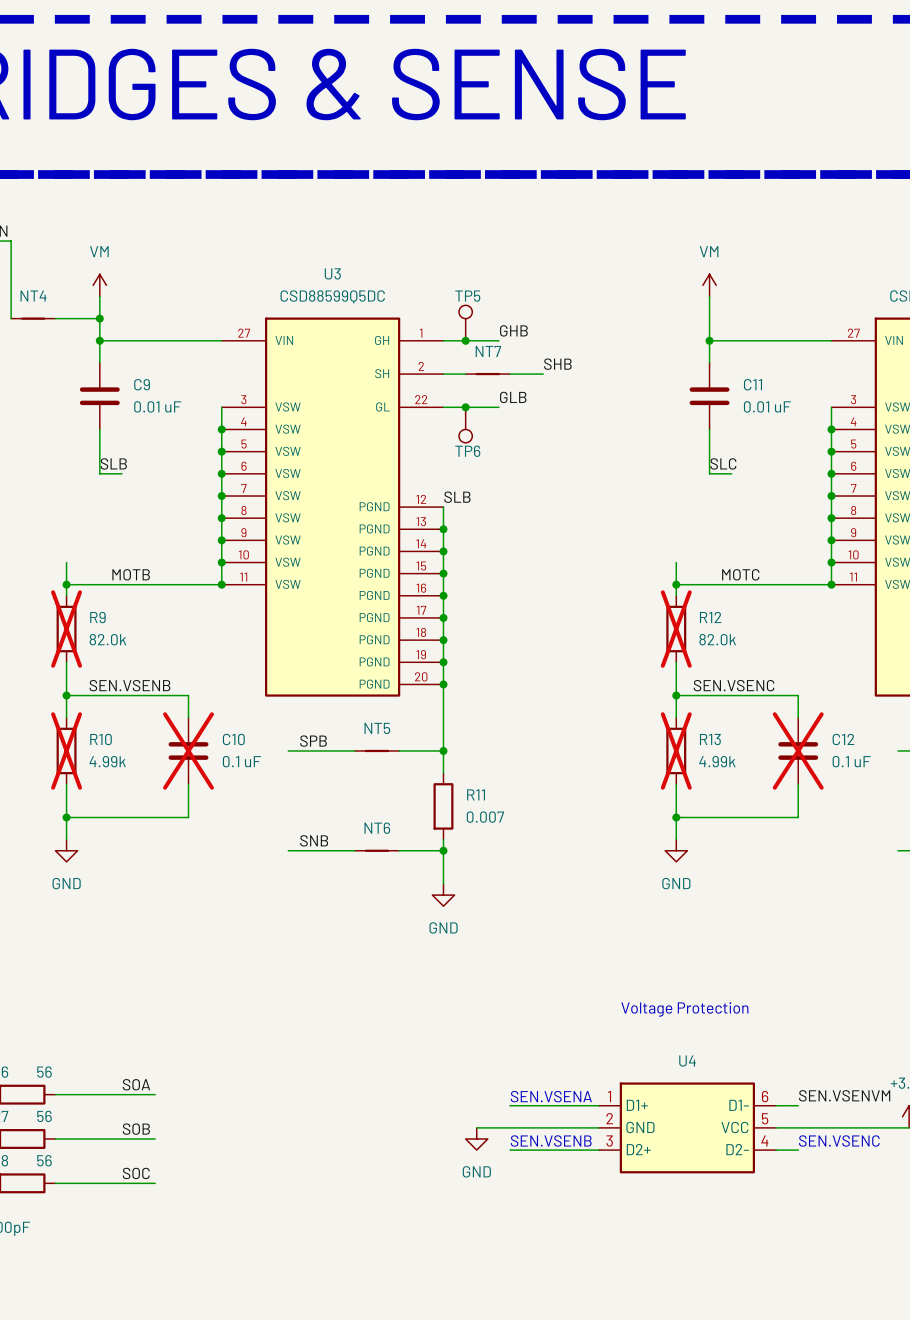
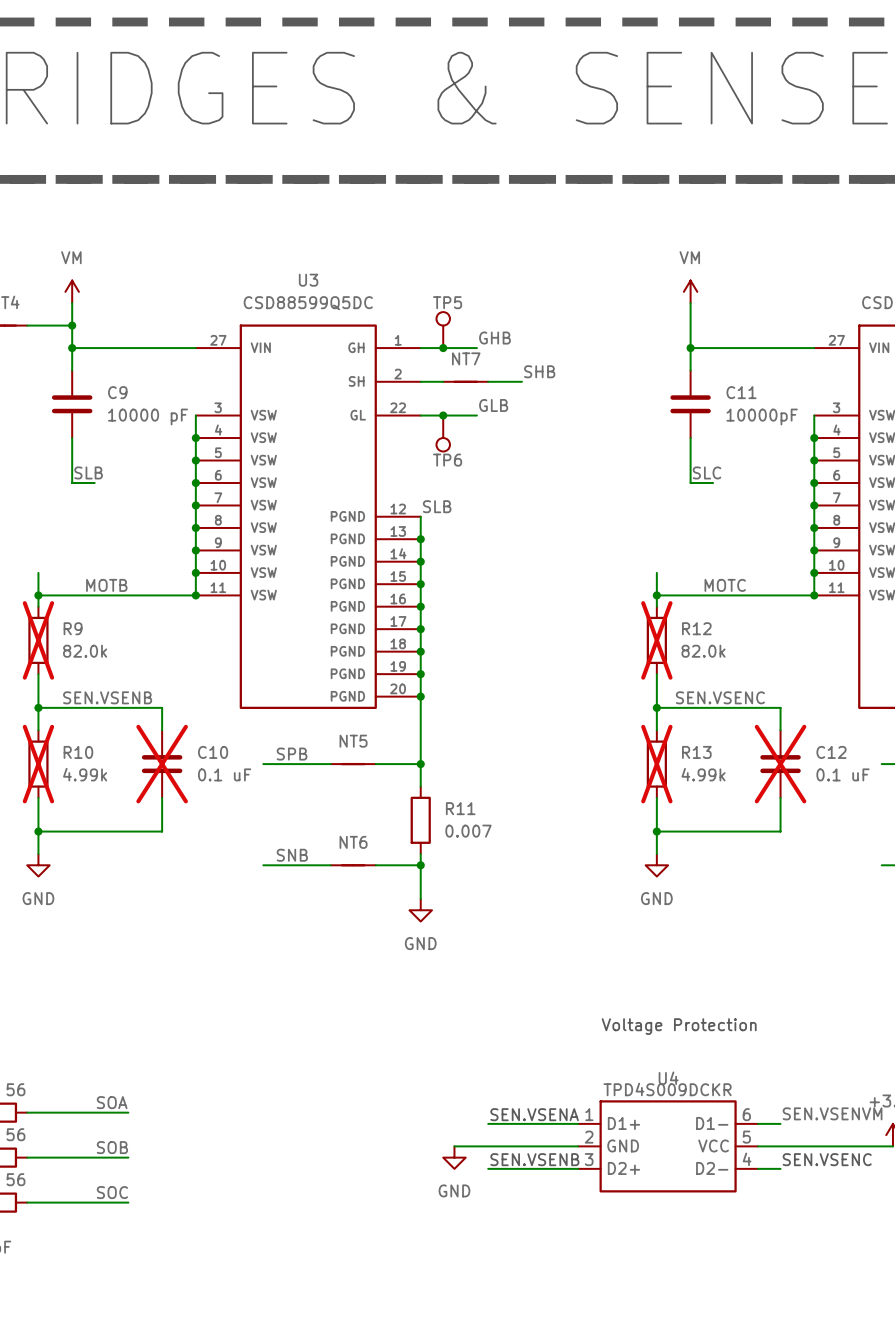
C9 value: 0.01 uF (157, 406) -> 10000 pF (148, 416)
C11 value: 0.01 uF (767, 406) -> 10000pF (762, 416)
U4 value: none -> TPD4S009DCKR (667, 1089)

